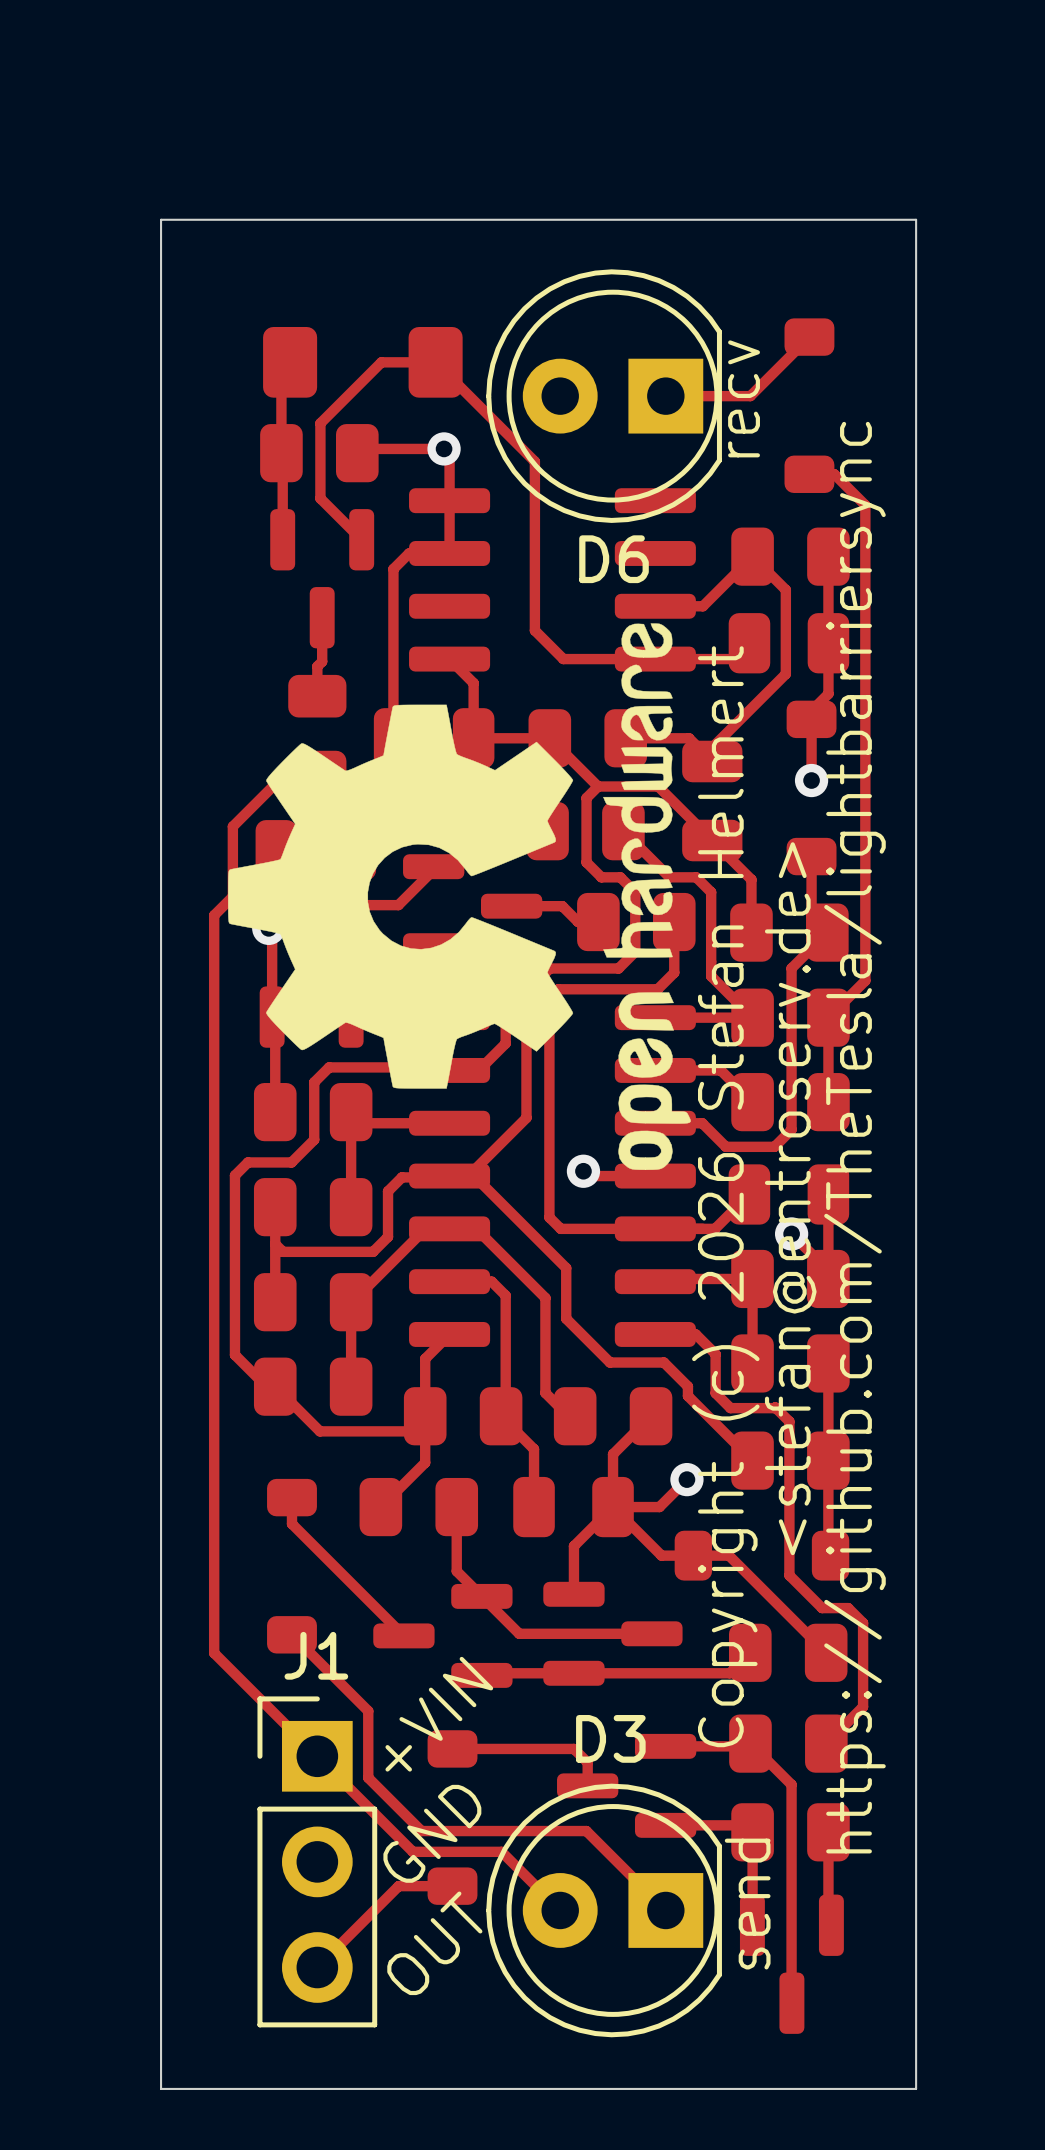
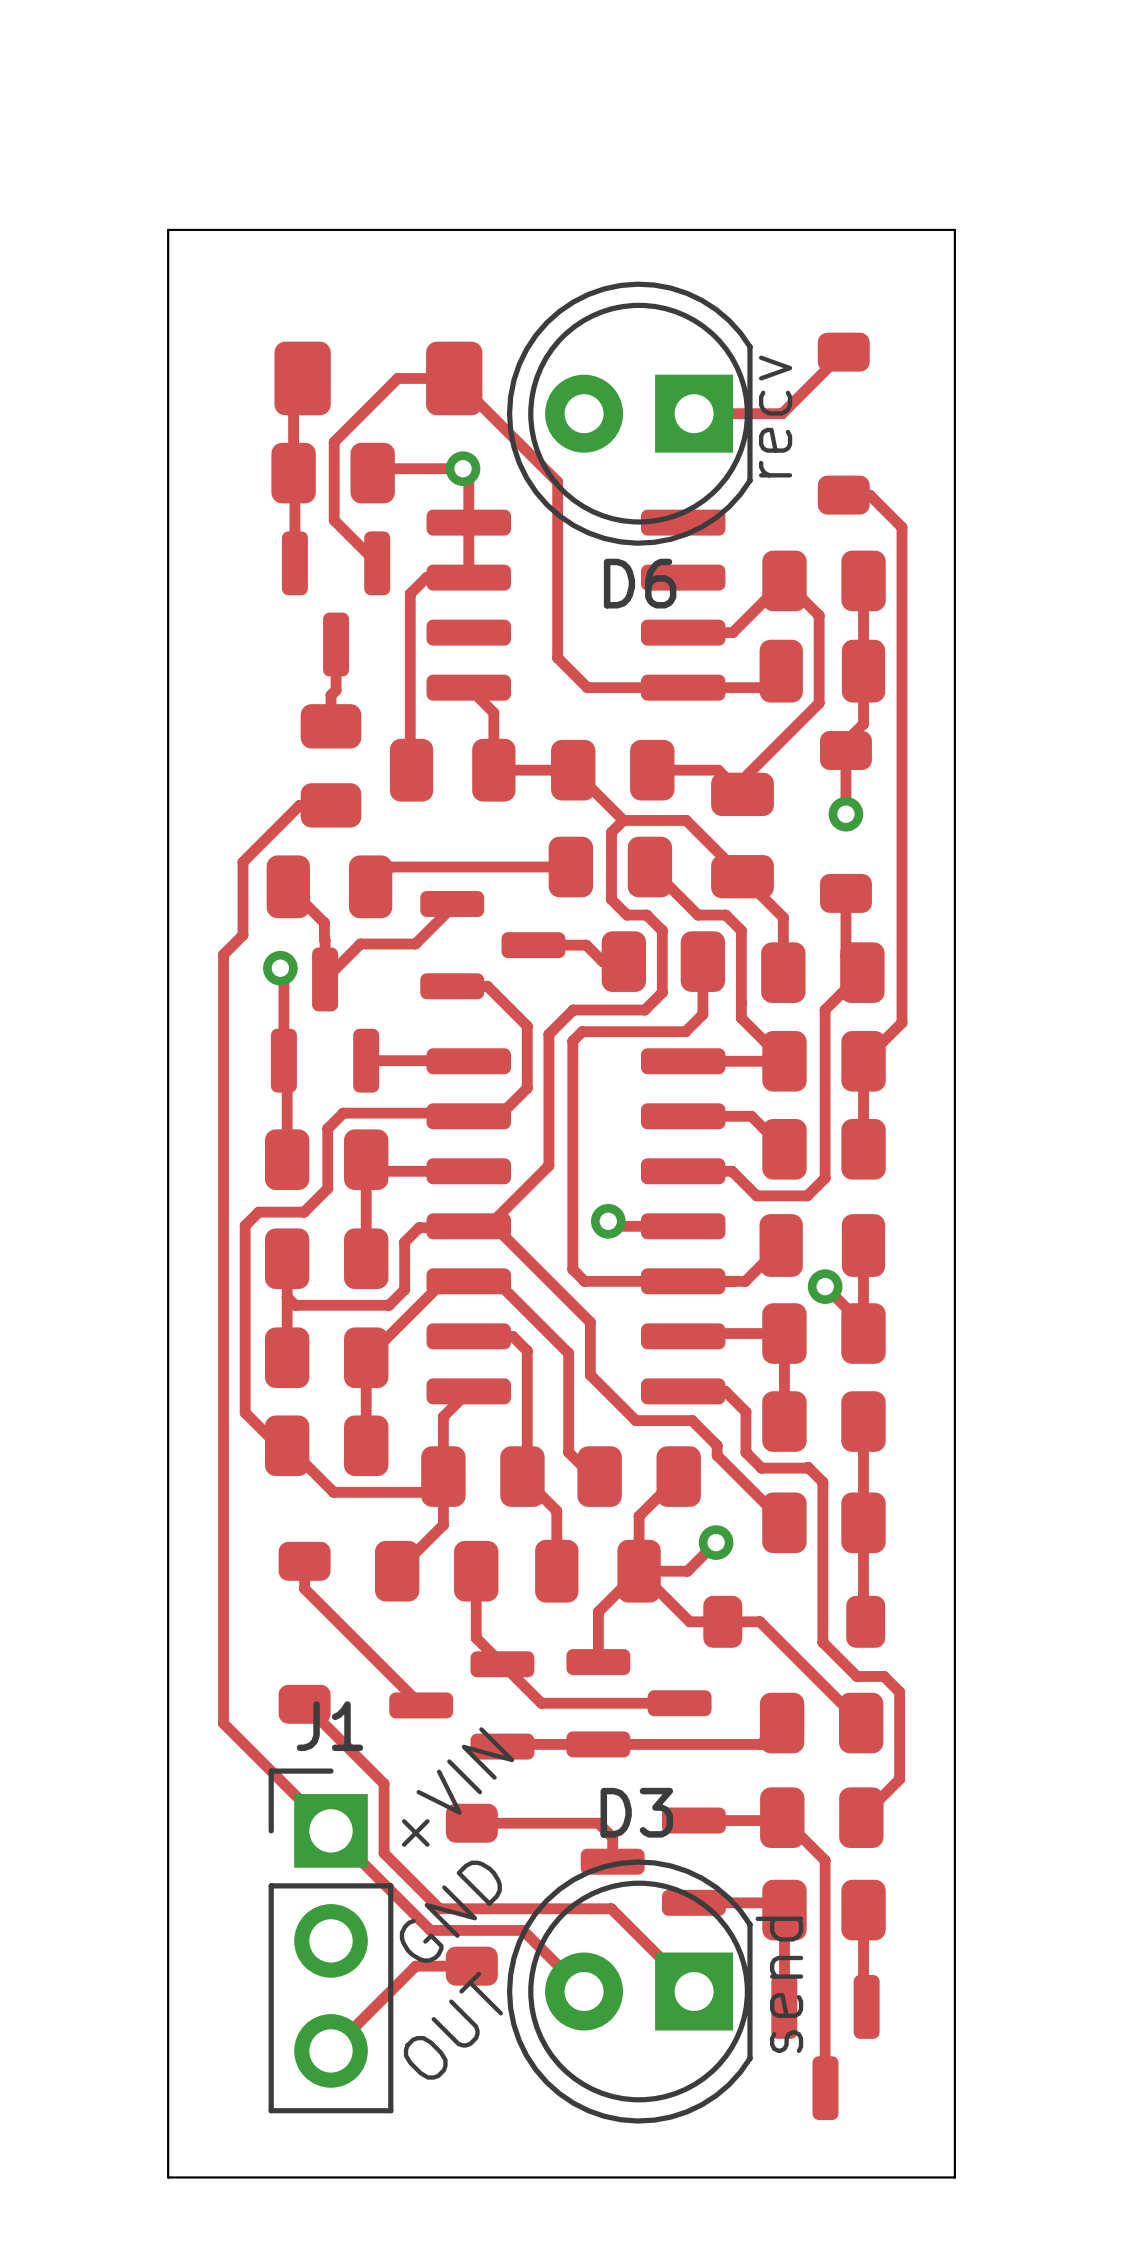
drawing: [228, 623, 691, 1171] -> none
text: https://github.com/TheTesla/lightbarriersync (854, 1137) -> none
text: Copyright (c) 2026 Stefan Helmert (725, 1196) -> none
text: <stefan@entroserv.de> (790, 1198) -> none

